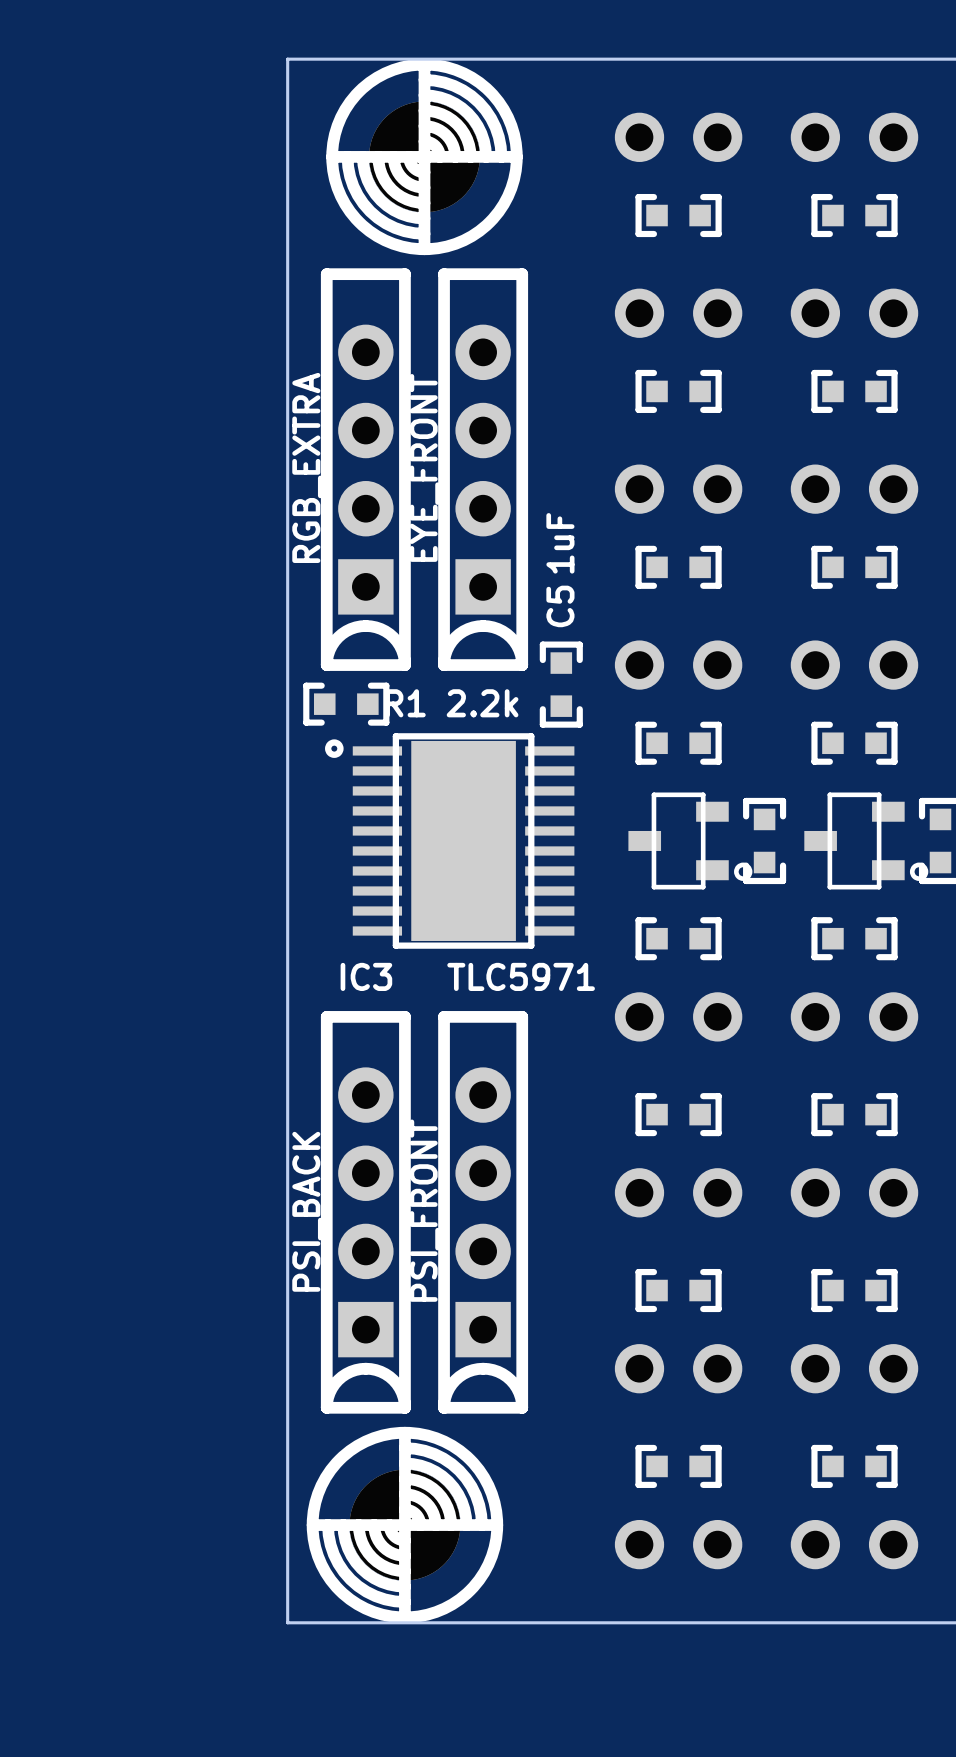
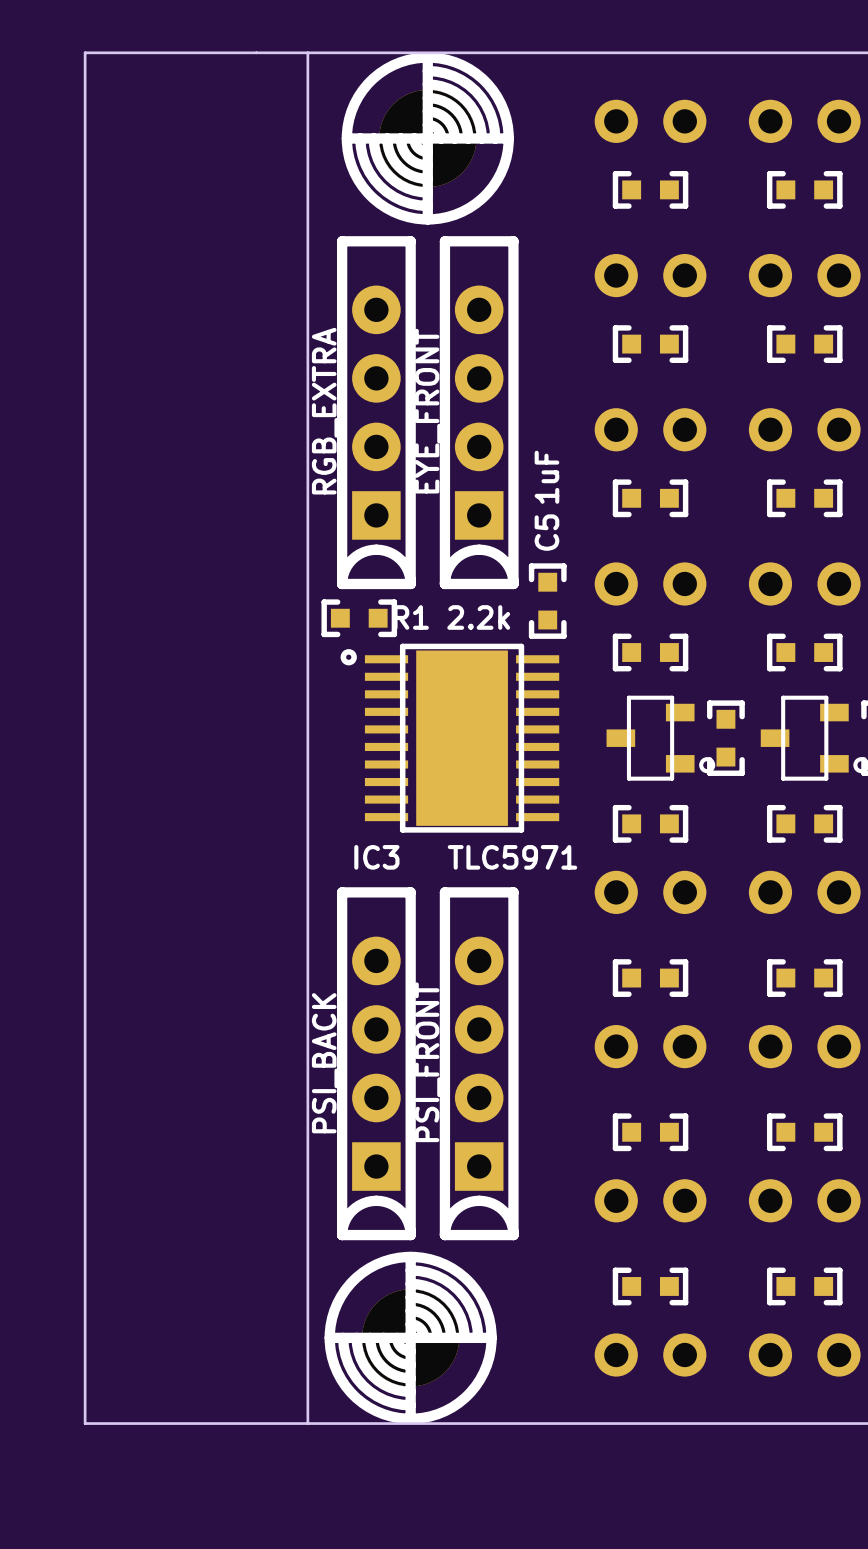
board edge: none -> (307, 52) (85, 52) (85, 1423) (307, 1423)

